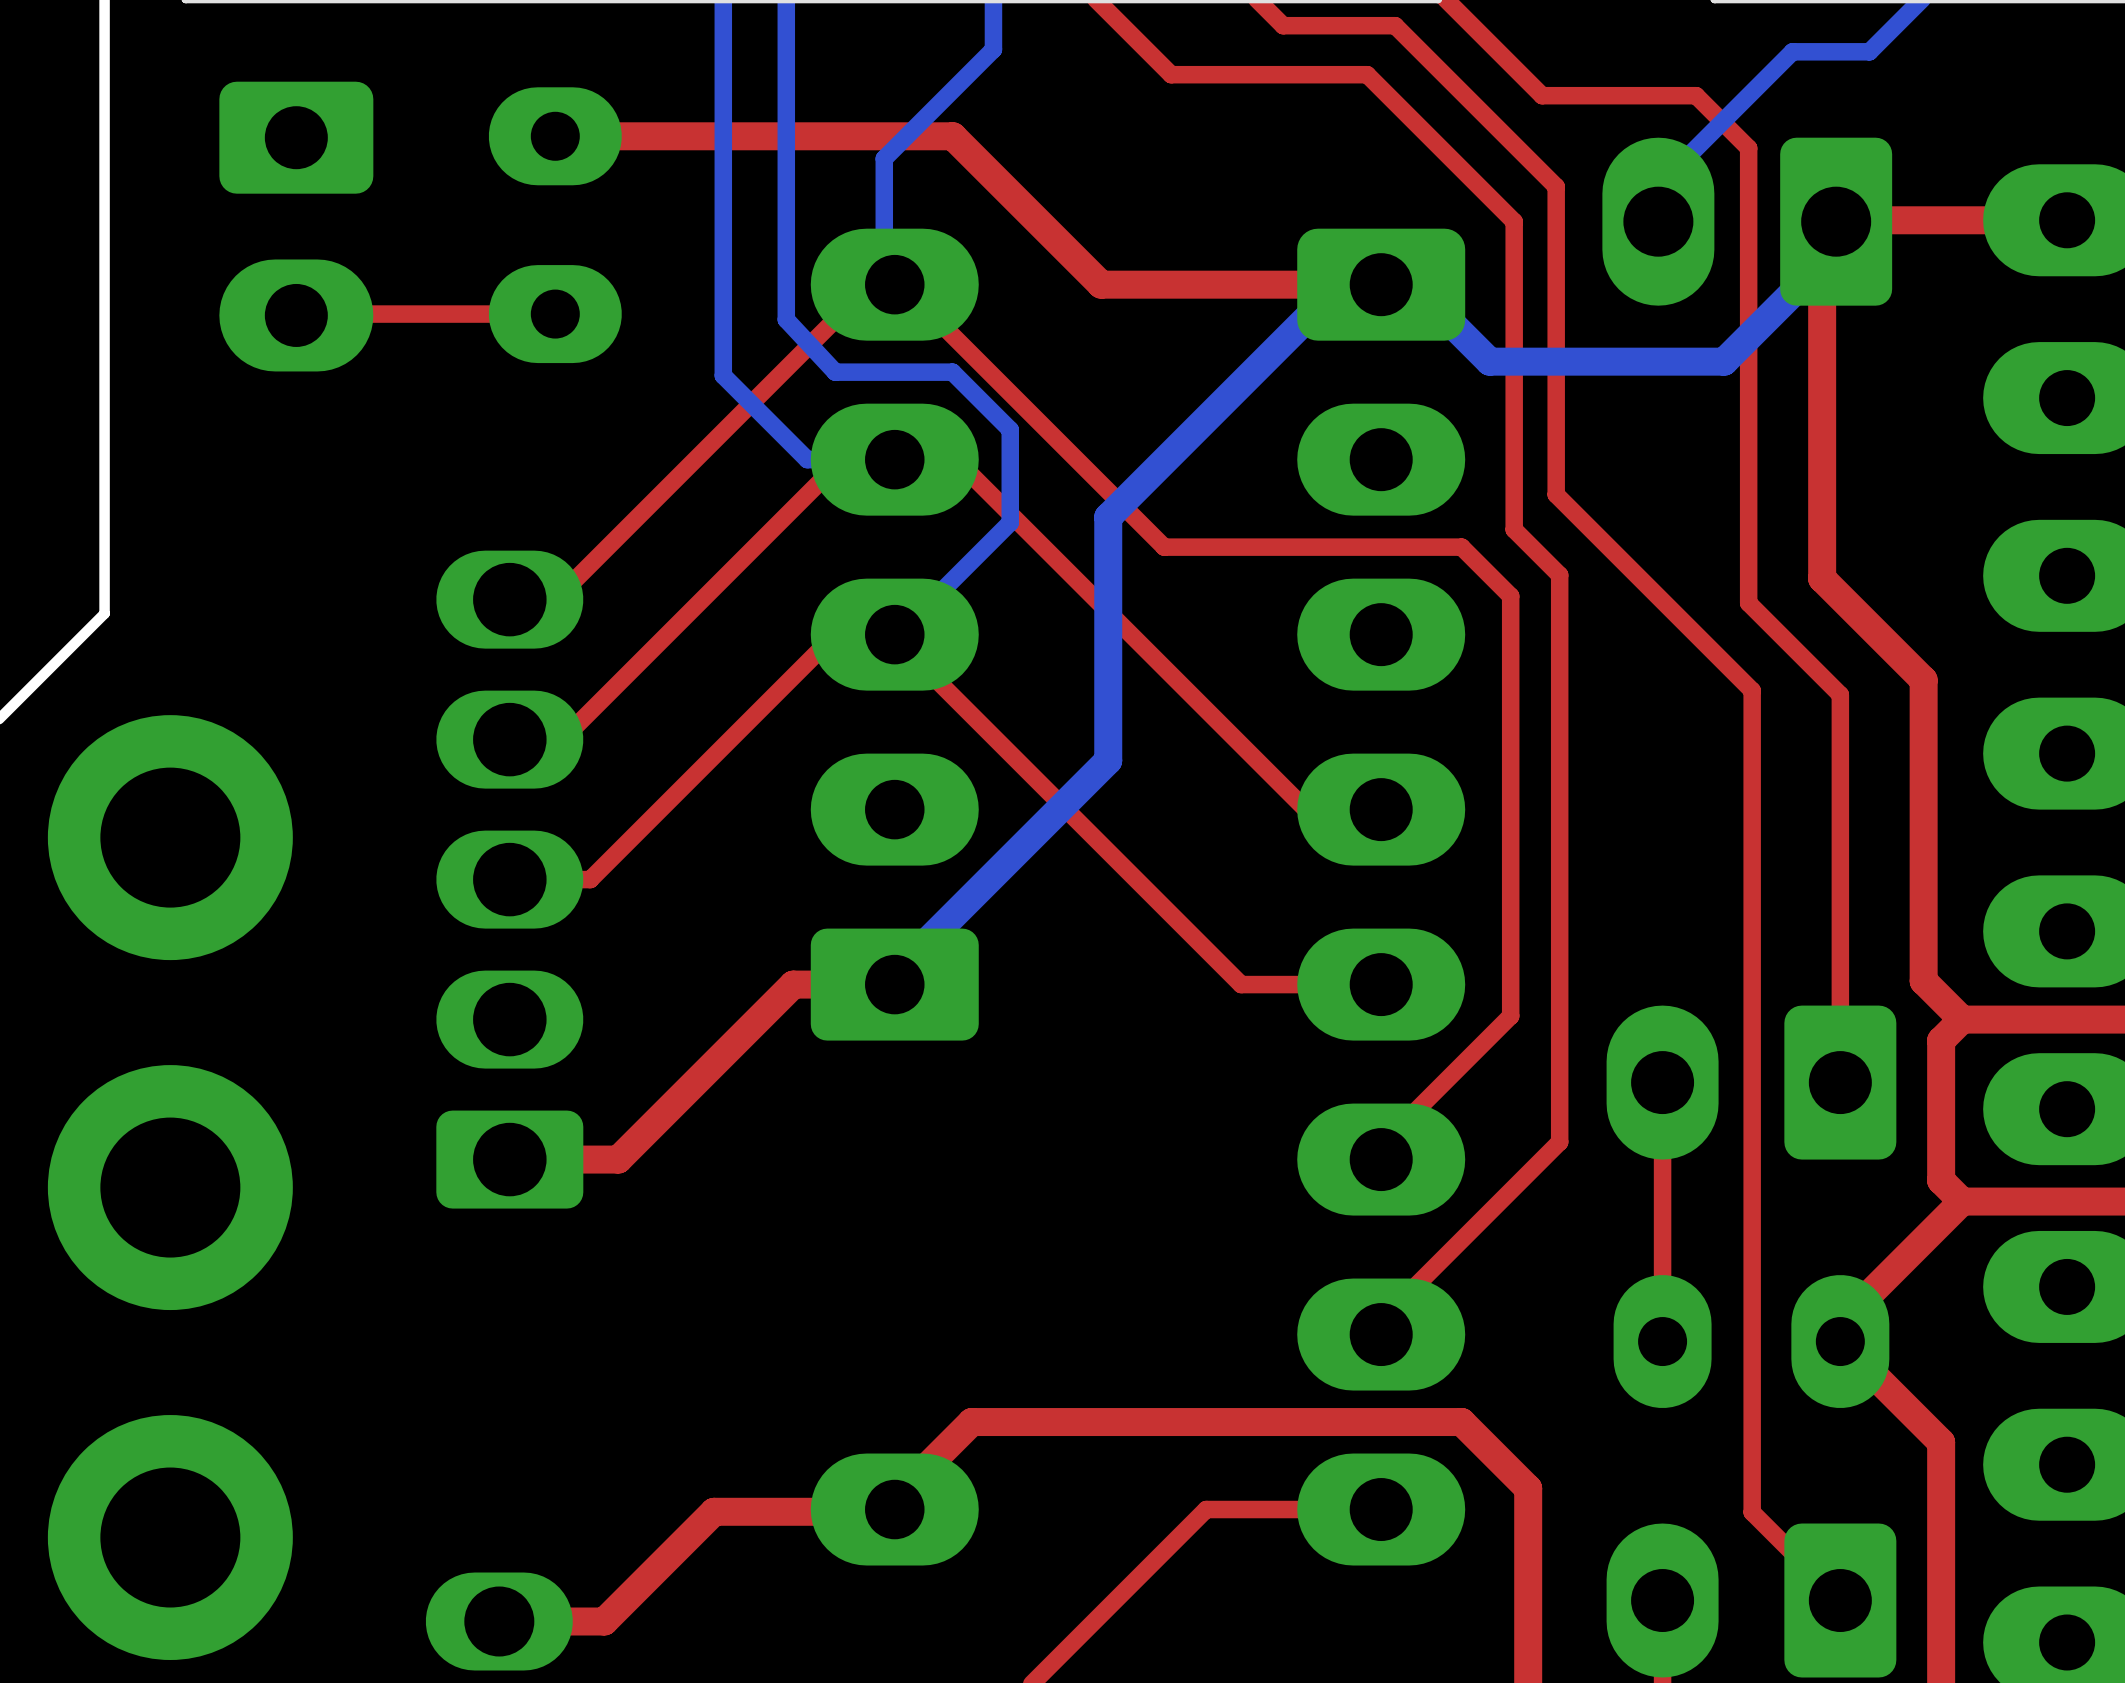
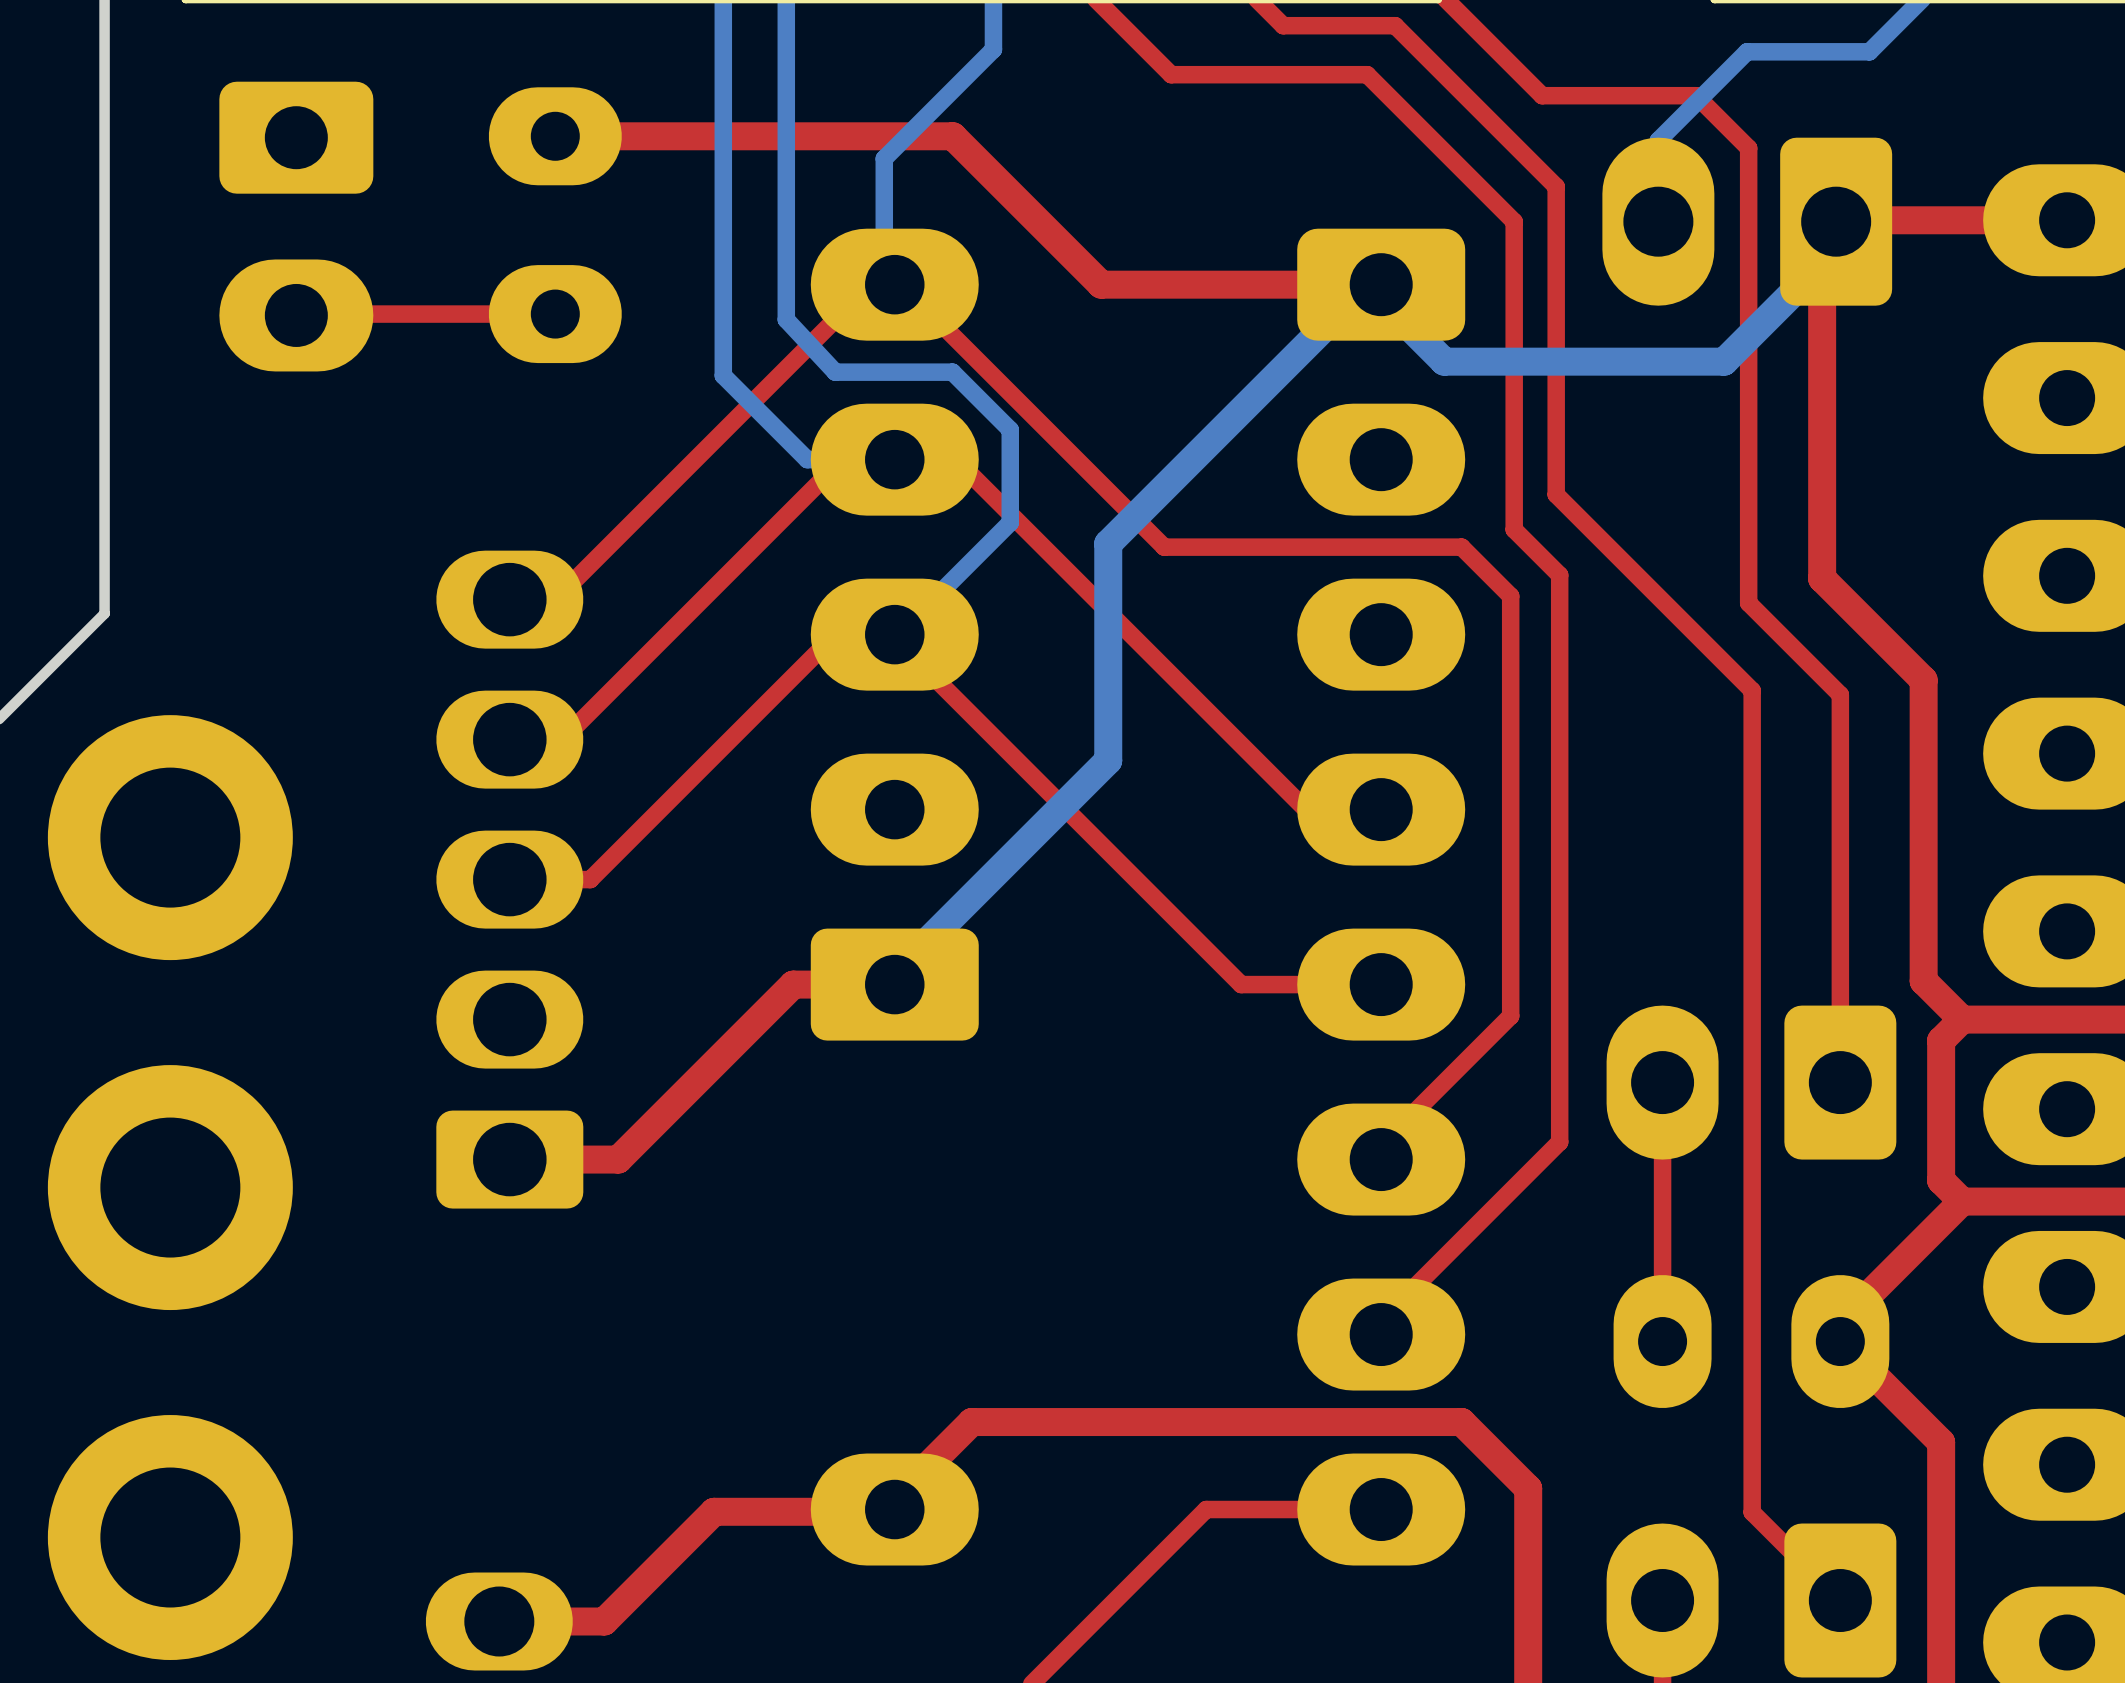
bottom track: (1792, 51) (1658, 185) -> (1792, 51) (1747, 51) (1658, 140) (1658, 185)
bottom track: (1489, 361) (1412, 284) (1340, 284) (1108, 517) (1108, 543) -> (1489, 361) (1444, 361) (1367, 284) (1108, 543)

